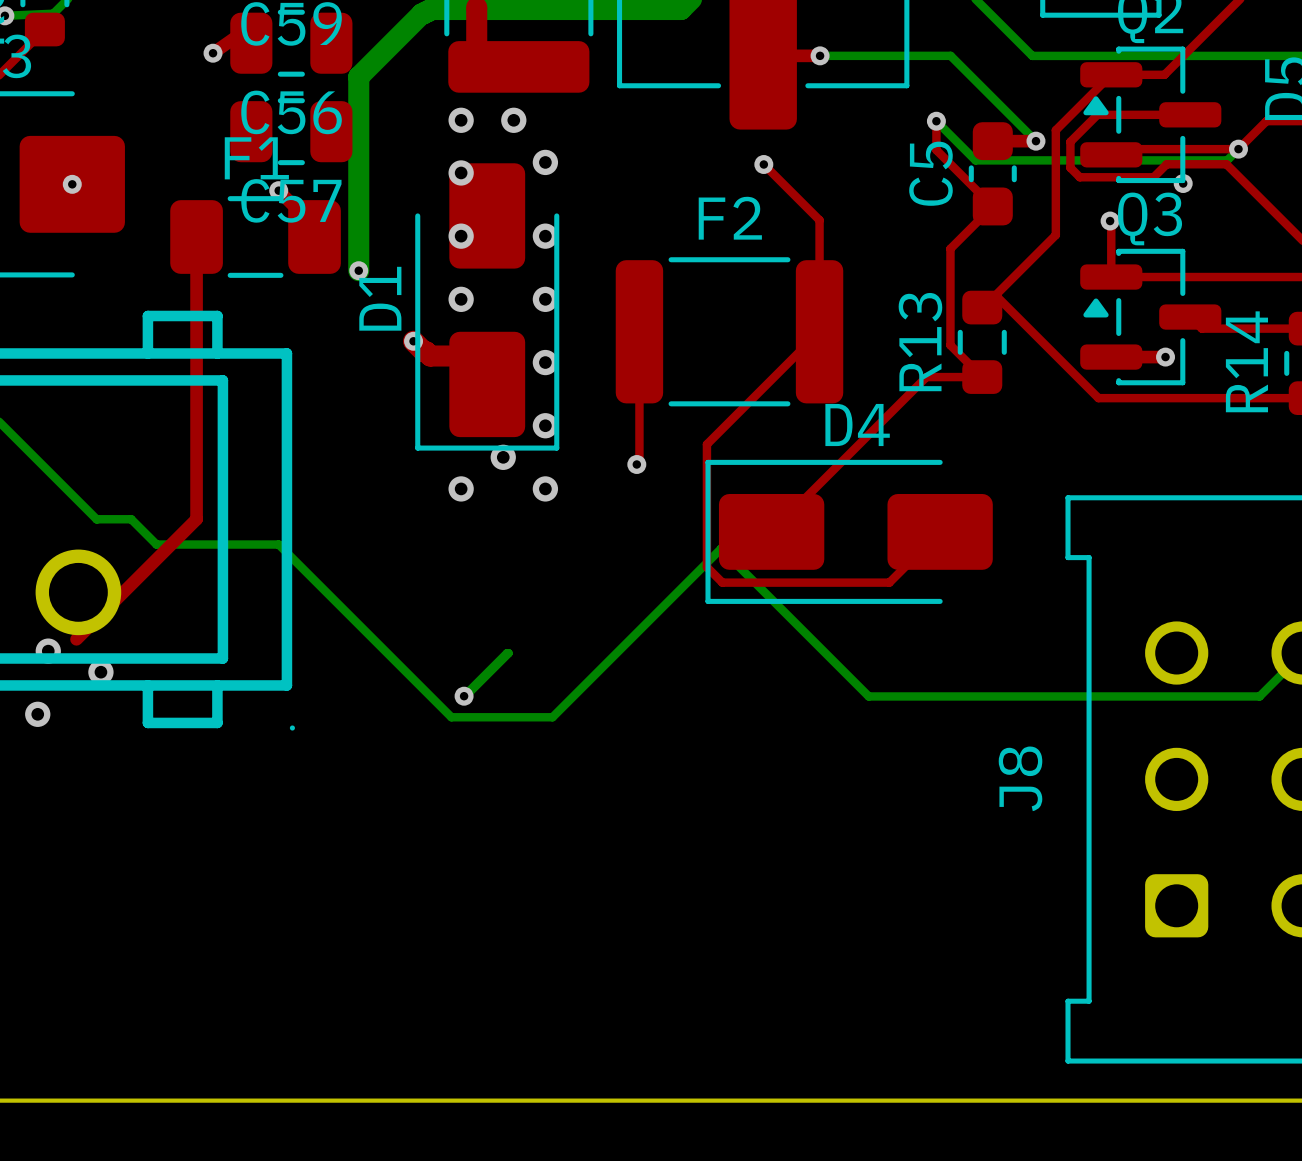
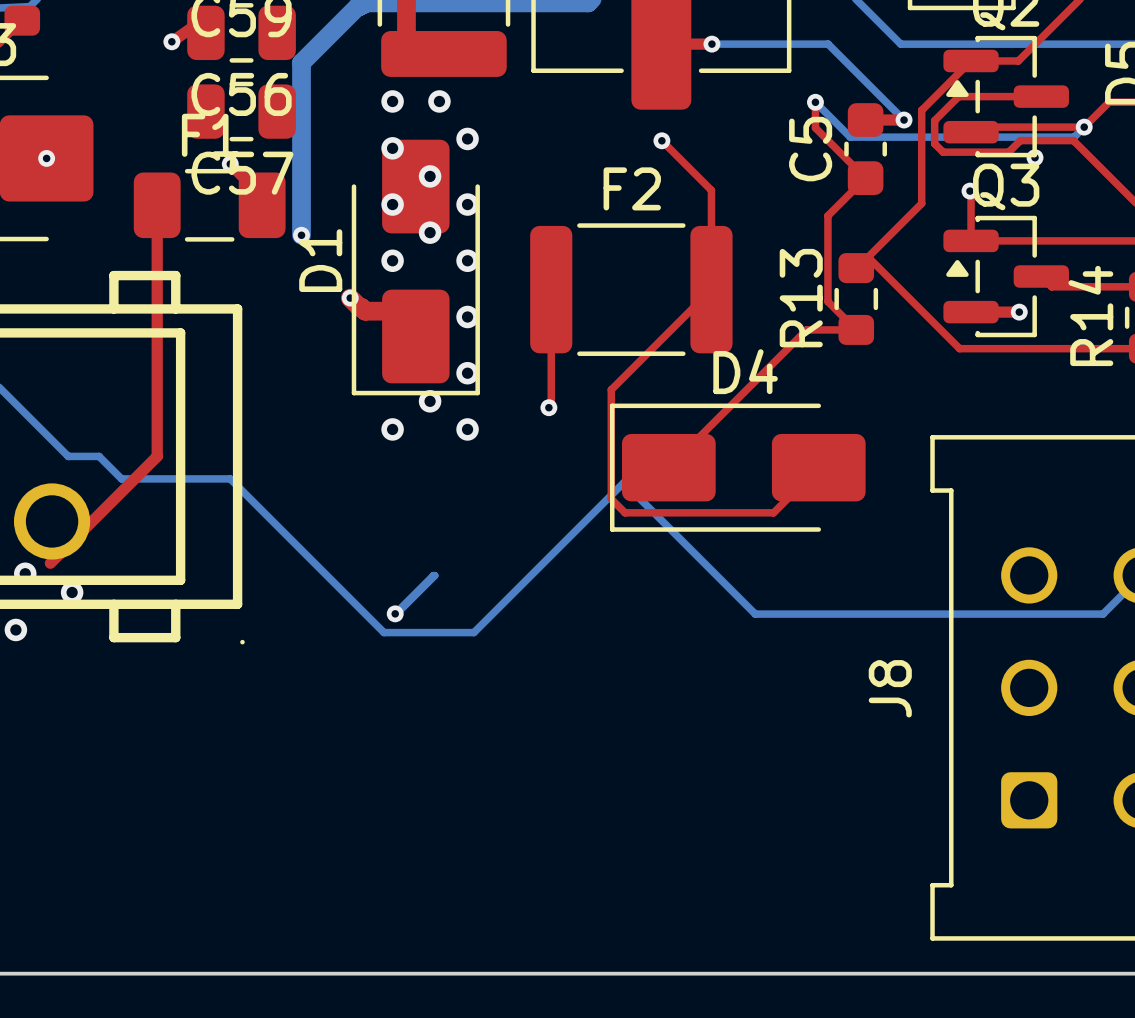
via: none -> (430, 176)
via: none -> (430, 232)

